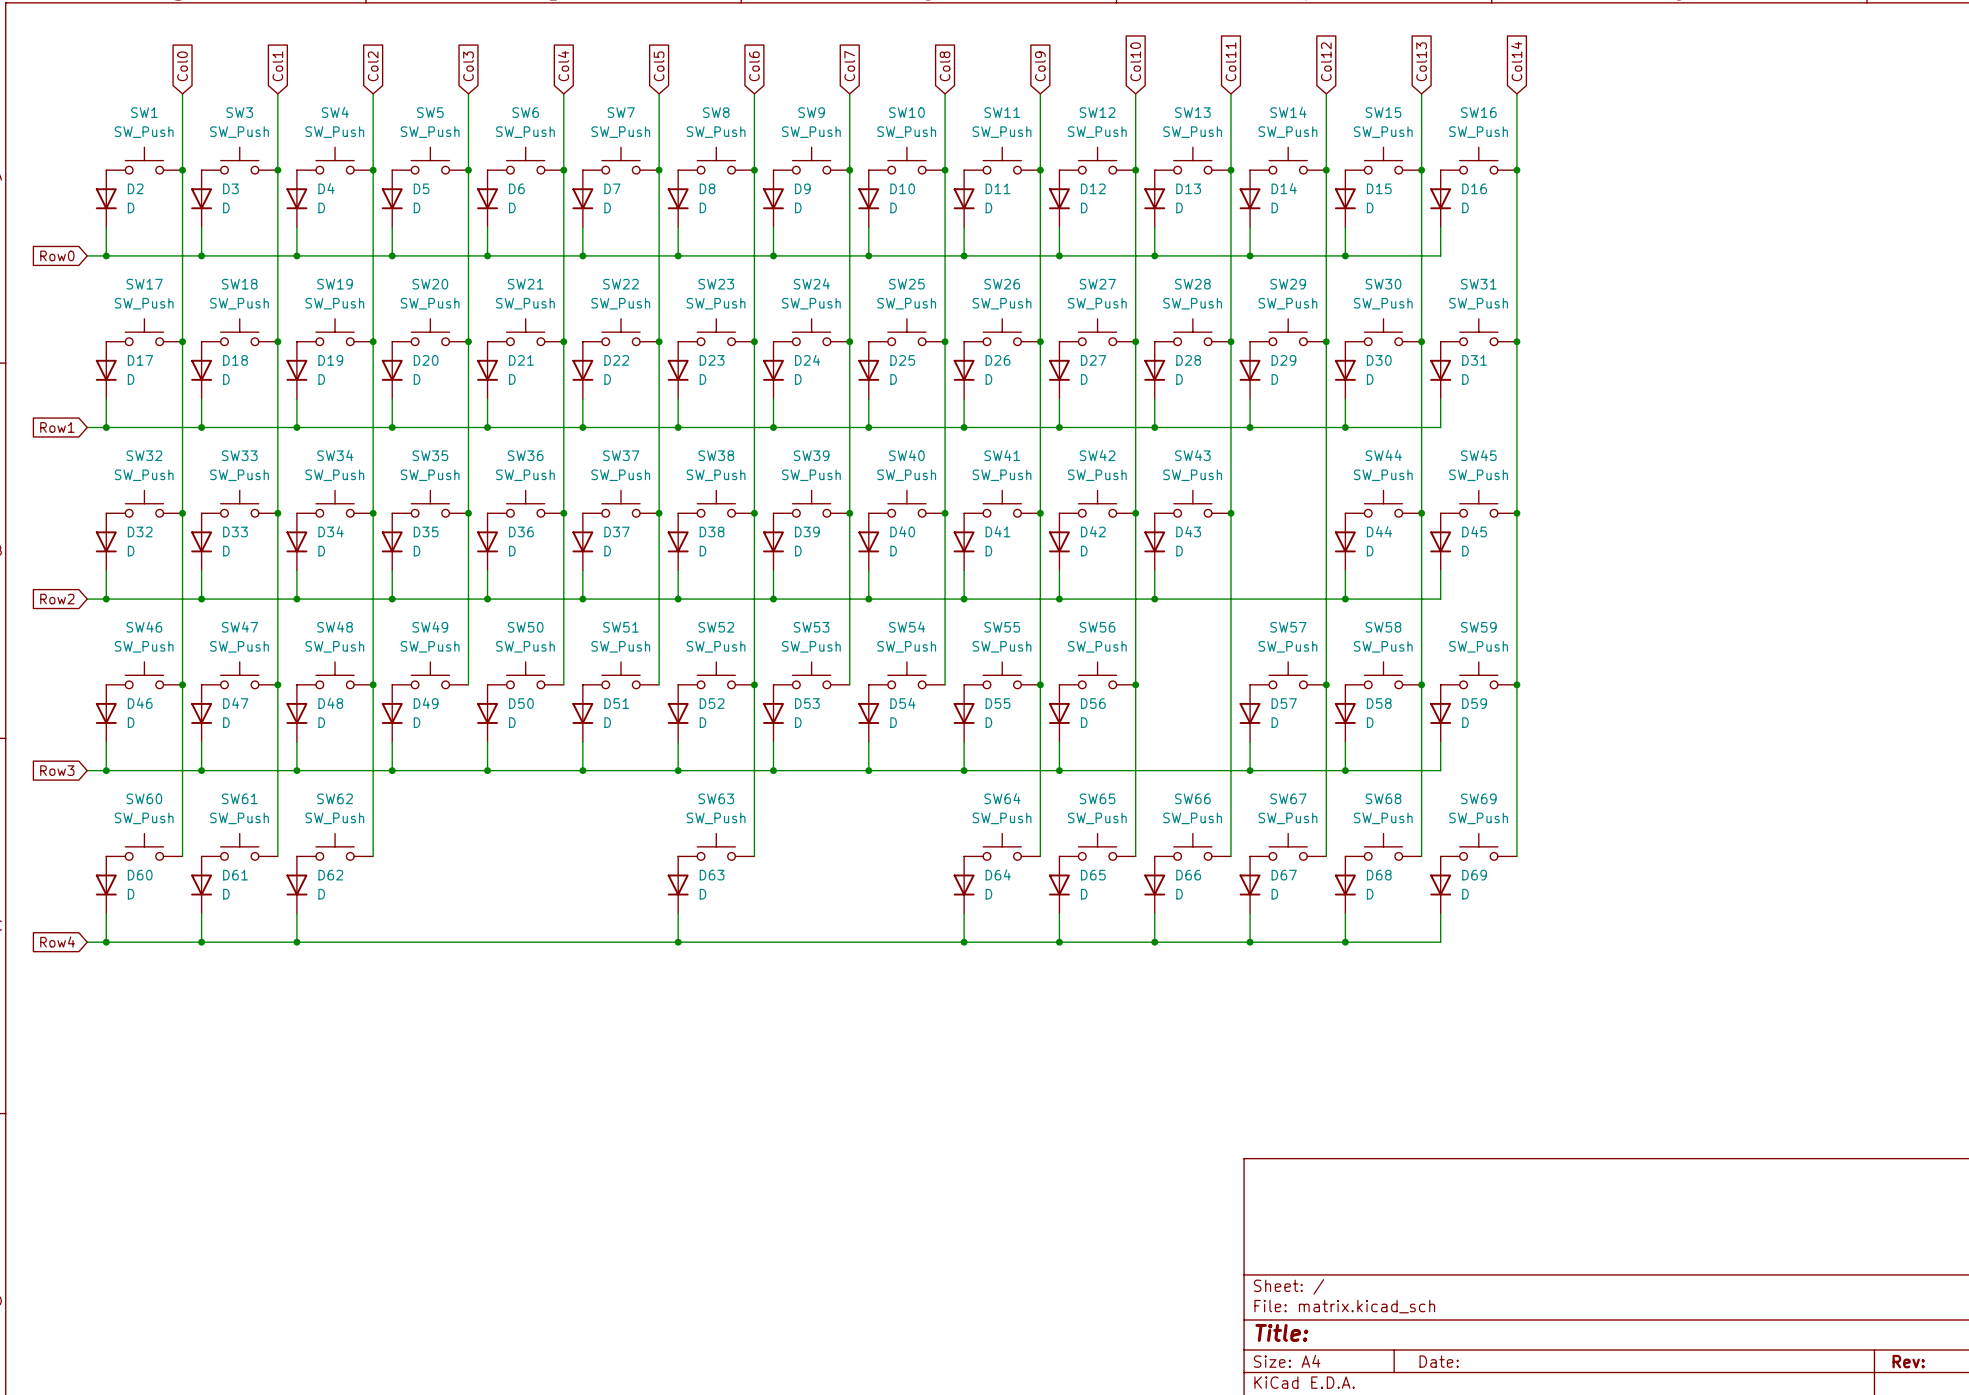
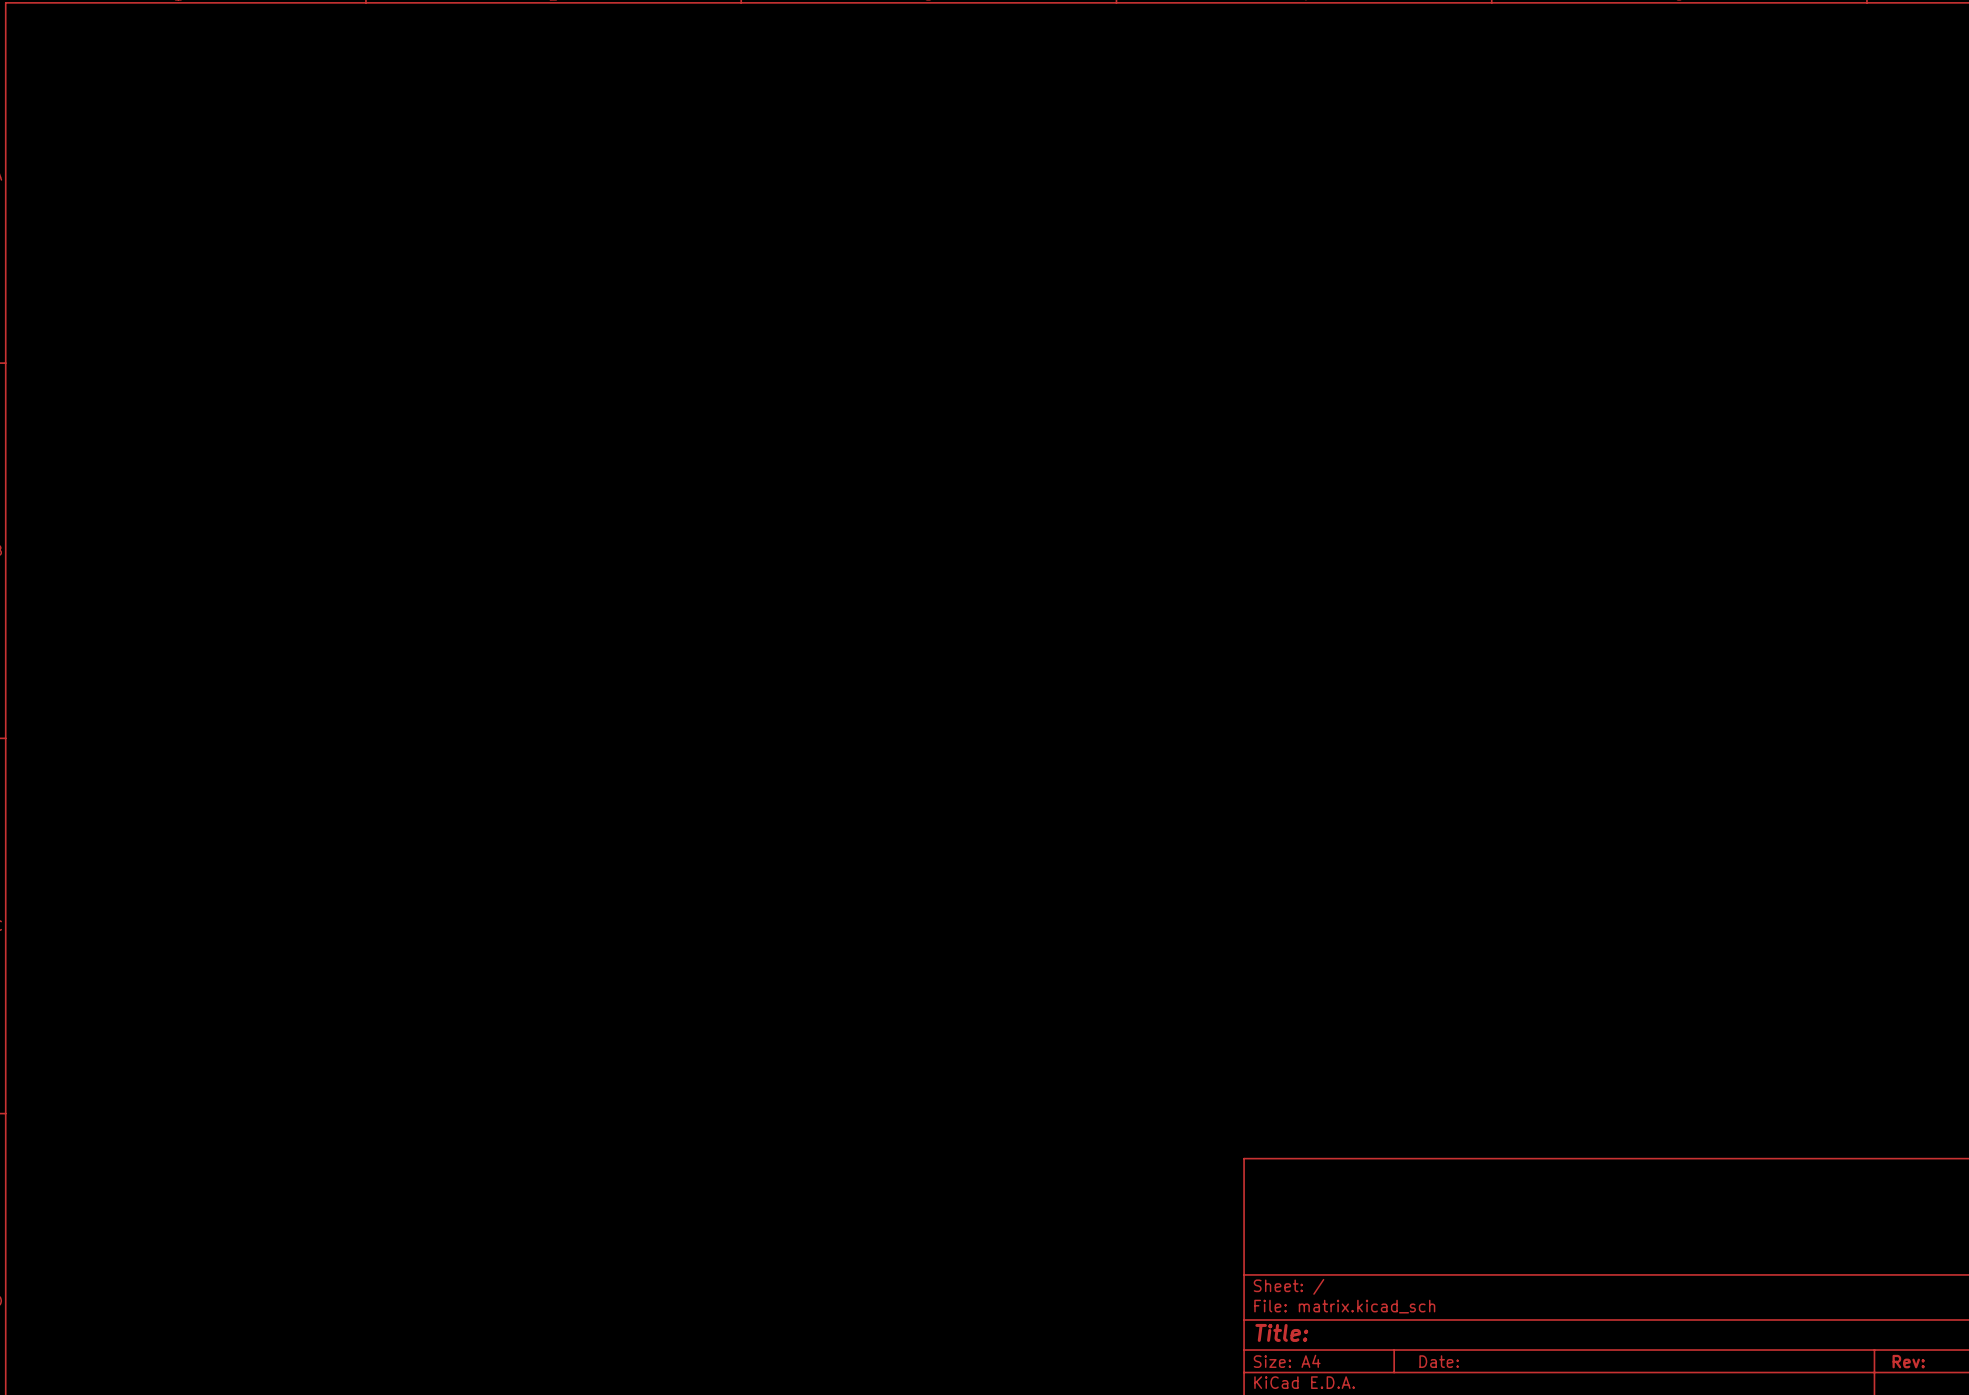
global label: Col10 (1135, 61) -> none
global label: Col11 (1230, 61) -> none
global label: Col12 (1326, 61) -> none
global label: Col13 (1421, 61) -> none
global label: Col14 (1516, 61) -> none
global label: Col0 (182, 66) -> none
global label: Col1 (277, 66) -> none
global label: Col2 (373, 66) -> none
global label: Col3 (468, 66) -> none
global label: Col4 (563, 66) -> none
global label: Col5 (659, 66) -> none
global label: Col6 (754, 66) -> none
global label: Col7 (849, 66) -> none
global label: Col8 (945, 66) -> none
global label: Col9 (1040, 66) -> none
wire: (182, 93) (182, 856) -> none
wire: (277, 93) (277, 856) -> none
wire: (373, 93) (373, 856) -> none
wire: (468, 93) (468, 684) -> none
wire: (563, 93) (563, 684) -> none
wire: (659, 93) (659, 684) -> none
wire: (754, 93) (754, 856) -> none
wire: (849, 93) (849, 684) -> none
wire: (945, 93) (945, 684) -> none
wire: (1040, 93) (1040, 856) -> none
wire: (1135, 93) (1135, 856) -> none
wire: (1230, 93) (1230, 856) -> none
wire: (1326, 93) (1326, 856) -> none
wire: (1421, 93) (1421, 856) -> none
wire: (1516, 93) (1516, 856) -> none
SW1: SW_Push (144, 160) -> none
SW3: SW_Push (239, 160) -> none
SW4: SW_Push (335, 160) -> none
SW5: SW_Push (430, 160) -> none
SW6: SW_Push (525, 160) -> none
SW7: SW_Push (620, 160) -> none
SW8: SW_Push (716, 160) -> none
SW9: SW_Push (811, 160) -> none
SW10: SW_Push (906, 160) -> none
SW11: SW_Push (1002, 160) -> none
SW12: SW_Push (1097, 160) -> none
SW13: SW_Push (1192, 160) -> none
SW14: SW_Push (1288, 160) -> none
SW15: SW_Push (1383, 160) -> none
SW16: SW_Push (1478, 160) -> none
junction: (182, 170) -> none
junction: (277, 170) -> none
junction: (373, 170) -> none
junction: (468, 170) -> none
junction: (563, 170) -> none
junction: (659, 170) -> none
junction: (754, 170) -> none
junction: (849, 170) -> none
junction: (945, 170) -> none
junction: (1040, 170) -> none
junction: (1135, 170) -> none
junction: (1230, 170) -> none
junction: (1326, 170) -> none
junction: (1421, 170) -> none
junction: (1516, 170) -> none
D2: D (106, 198) -> none
D3: D (201, 198) -> none
D4: D (296, 198) -> none
D5: D (392, 198) -> none
D6: D (487, 198) -> none
D7: D (582, 198) -> none
D8: D (678, 198) -> none
D9: D (773, 198) -> none
D10: D (868, 198) -> none
D11: D (964, 198) -> none
D12: D (1059, 198) -> none
D13: D (1154, 198) -> none
D14: D (1250, 198) -> none
D15: D (1345, 198) -> none
D16: D (1440, 198) -> none
wire: (106, 227) (106, 255) -> none
wire: (201, 227) (201, 255) -> none
wire: (296, 227) (296, 255) -> none
wire: (392, 227) (392, 255) -> none
wire: (487, 227) (487, 255) -> none
wire: (582, 227) (582, 255) -> none
wire: (678, 227) (678, 255) -> none
wire: (773, 227) (773, 255) -> none
wire: (868, 227) (868, 255) -> none
wire: (964, 227) (964, 255) -> none
wire: (1059, 227) (1059, 255) -> none
wire: (1154, 227) (1154, 255) -> none
wire: (1250, 227) (1250, 255) -> none
wire: (1345, 227) (1345, 255) -> none
wire: (1440, 227) (1440, 255) (87, 255) -> none
global label: Row0 (57, 255) -> none
junction: (106, 255) -> none
junction: (201, 255) -> none
junction: (296, 255) -> none
junction: (392, 255) -> none
junction: (487, 255) -> none
junction: (582, 255) -> none
junction: (678, 255) -> none
junction: (773, 255) -> none
junction: (868, 255) -> none
junction: (964, 255) -> none
junction: (1059, 255) -> none
junction: (1154, 255) -> none
junction: (1250, 255) -> none
junction: (1345, 255) -> none
SW17: SW_Push (144, 332) -> none
SW18: SW_Push (239, 332) -> none
SW19: SW_Push (335, 332) -> none
SW20: SW_Push (430, 332) -> none
SW21: SW_Push (525, 332) -> none
SW22: SW_Push (620, 332) -> none
SW23: SW_Push (716, 332) -> none
SW24: SW_Push (811, 332) -> none
SW25: SW_Push (906, 332) -> none
SW26: SW_Push (1002, 332) -> none
SW27: SW_Push (1097, 332) -> none
SW28: SW_Push (1192, 332) -> none
SW29: SW_Push (1288, 332) -> none
SW30: SW_Push (1383, 332) -> none
SW31: SW_Push (1478, 332) -> none
junction: (182, 341) -> none
junction: (277, 341) -> none
junction: (373, 341) -> none
junction: (468, 341) -> none
junction: (563, 341) -> none
junction: (659, 341) -> none
junction: (754, 341) -> none
junction: (849, 341) -> none
junction: (945, 341) -> none
junction: (1040, 341) -> none
junction: (1135, 341) -> none
junction: (1230, 341) -> none
junction: (1326, 341) -> none
junction: (1421, 341) -> none
junction: (1516, 341) -> none
D17: D (106, 370) -> none
D18: D (201, 370) -> none
D19: D (296, 370) -> none
D20: D (392, 370) -> none
D21: D (487, 370) -> none
D22: D (582, 370) -> none
D23: D (678, 370) -> none
D24: D (773, 370) -> none
D25: D (868, 370) -> none
D26: D (964, 370) -> none
D27: D (1059, 370) -> none
D28: D (1154, 370) -> none
D29: D (1250, 370) -> none
D30: D (1345, 370) -> none
D31: D (1440, 370) -> none
wire: (106, 398) (106, 427) -> none
wire: (201, 398) (201, 427) -> none
wire: (296, 398) (296, 427) -> none
wire: (392, 398) (392, 427) -> none
wire: (487, 398) (487, 427) -> none
wire: (582, 398) (582, 427) -> none
wire: (678, 398) (678, 427) -> none
wire: (773, 398) (773, 427) -> none
wire: (868, 398) (868, 427) -> none
wire: (964, 398) (964, 427) -> none
wire: (1059, 398) (1059, 427) -> none
wire: (1154, 398) (1154, 427) -> none
wire: (1250, 398) (1250, 427) -> none
wire: (1345, 398) (1345, 427) -> none
wire: (1440, 398) (1440, 427) (87, 427) -> none
global label: Row1 (57, 427) -> none
junction: (106, 427) -> none
junction: (201, 427) -> none
junction: (296, 427) -> none
junction: (392, 427) -> none
junction: (487, 427) -> none
junction: (582, 427) -> none
junction: (678, 427) -> none
junction: (773, 427) -> none
junction: (868, 427) -> none
junction: (964, 427) -> none
junction: (1059, 427) -> none
junction: (1154, 427) -> none
junction: (1250, 427) -> none
junction: (1345, 427) -> none
SW32: SW_Push (144, 503) -> none
SW33: SW_Push (239, 503) -> none
SW34: SW_Push (335, 503) -> none
SW35: SW_Push (430, 503) -> none
SW36: SW_Push (525, 503) -> none
SW37: SW_Push (620, 503) -> none
SW38: SW_Push (716, 503) -> none
SW39: SW_Push (811, 503) -> none
SW40: SW_Push (906, 503) -> none
SW41: SW_Push (1002, 503) -> none
SW42: SW_Push (1097, 503) -> none
SW43: SW_Push (1192, 503) -> none
SW44: SW_Push (1383, 503) -> none
SW45: SW_Push (1478, 503) -> none
junction: (182, 513) -> none
junction: (277, 513) -> none
junction: (373, 513) -> none
junction: (468, 513) -> none
junction: (563, 513) -> none
junction: (659, 513) -> none
junction: (754, 513) -> none
junction: (849, 513) -> none
junction: (945, 513) -> none
junction: (1040, 513) -> none
junction: (1135, 513) -> none
junction: (1230, 513) -> none
junction: (1421, 513) -> none
junction: (1516, 513) -> none
D32: D (106, 541) -> none
D33: D (201, 541) -> none
D34: D (296, 541) -> none
D35: D (392, 541) -> none
D36: D (487, 541) -> none
D37: D (582, 541) -> none
D38: D (678, 541) -> none
D39: D (773, 541) -> none
D40: D (868, 541) -> none
D41: D (964, 541) -> none
D42: D (1059, 541) -> none
D43: D (1154, 541) -> none
D44: D (1345, 541) -> none
D45: D (1440, 541) -> none
wire: (106, 570) (106, 599) -> none
wire: (201, 570) (201, 599) -> none
wire: (296, 570) (296, 599) -> none
wire: (392, 570) (392, 599) -> none
wire: (487, 570) (487, 599) -> none
wire: (582, 570) (582, 599) -> none
wire: (678, 570) (678, 599) -> none
wire: (773, 570) (773, 599) -> none
wire: (868, 570) (868, 599) -> none
wire: (964, 570) (964, 599) -> none
wire: (1059, 570) (1059, 599) -> none
wire: (1154, 570) (1154, 599) -> none
wire: (1345, 570) (1345, 599) -> none
wire: (1440, 570) (1440, 599) (87, 599) -> none
global label: Row2 (57, 599) -> none
junction: (106, 599) -> none
junction: (201, 599) -> none
junction: (296, 599) -> none
junction: (392, 599) -> none
junction: (487, 599) -> none
junction: (582, 599) -> none
junction: (678, 599) -> none
junction: (773, 599) -> none
junction: (868, 599) -> none
junction: (964, 599) -> none
junction: (1059, 599) -> none
junction: (1154, 599) -> none
junction: (1345, 599) -> none
SW46: SW_Push (144, 675) -> none
SW47: SW_Push (239, 675) -> none
SW48: SW_Push (335, 675) -> none
SW49: SW_Push (430, 675) -> none
SW50: SW_Push (525, 675) -> none
SW51: SW_Push (620, 675) -> none
SW52: SW_Push (716, 675) -> none
SW53: SW_Push (811, 675) -> none
SW54: SW_Push (906, 675) -> none
SW55: SW_Push (1002, 675) -> none
SW56: SW_Push (1097, 675) -> none
SW57: SW_Push (1288, 675) -> none
SW58: SW_Push (1383, 675) -> none
SW59: SW_Push (1478, 675) -> none
junction: (182, 684) -> none
junction: (277, 684) -> none
junction: (373, 684) -> none
junction: (754, 684) -> none
junction: (1040, 684) -> none
junction: (1135, 684) -> none
junction: (1326, 684) -> none
junction: (1421, 684) -> none
junction: (1516, 684) -> none
D46: D (106, 713) -> none
D47: D (201, 713) -> none
D48: D (296, 713) -> none
D49: D (392, 713) -> none
D50: D (487, 713) -> none
D51: D (582, 713) -> none
D52: D (678, 713) -> none
D53: D (773, 713) -> none
D54: D (868, 713) -> none
D55: D (964, 713) -> none
D56: D (1059, 713) -> none
D57: D (1250, 713) -> none
D58: D (1345, 713) -> none
D59: D (1440, 713) -> none
wire: (106, 742) (106, 770) -> none
wire: (201, 742) (201, 770) -> none
wire: (296, 742) (296, 770) -> none
wire: (392, 742) (392, 770) -> none
wire: (487, 742) (487, 770) -> none
wire: (582, 742) (582, 770) -> none
wire: (678, 742) (678, 770) -> none
wire: (773, 742) (773, 770) -> none
wire: (868, 742) (868, 770) -> none
wire: (964, 742) (964, 770) -> none
wire: (1059, 742) (1059, 770) -> none
wire: (1250, 742) (1250, 770) -> none
wire: (1345, 742) (1345, 770) -> none
wire: (1440, 742) (1440, 770) (87, 770) -> none
global label: Row3 (57, 770) -> none
junction: (106, 770) -> none
junction: (201, 770) -> none
junction: (296, 770) -> none
junction: (392, 770) -> none
junction: (487, 770) -> none
junction: (582, 770) -> none
junction: (678, 770) -> none
junction: (773, 770) -> none
junction: (868, 770) -> none
junction: (964, 770) -> none
junction: (1059, 770) -> none
junction: (1250, 770) -> none
junction: (1345, 770) -> none
SW60: SW_Push (144, 846) -> none
SW61: SW_Push (239, 846) -> none
SW62: SW_Push (335, 846) -> none
SW63: SW_Push (716, 846) -> none
SW64: SW_Push (1002, 846) -> none
SW65: SW_Push (1097, 846) -> none
SW66: SW_Push (1192, 846) -> none
SW67: SW_Push (1288, 846) -> none
SW68: SW_Push (1383, 846) -> none
SW69: SW_Push (1478, 846) -> none
D60: D (106, 885) -> none
D61: D (201, 885) -> none
D62: D (296, 885) -> none
D63: D (678, 885) -> none
D64: D (964, 885) -> none
D65: D (1059, 885) -> none
D66: D (1154, 885) -> none
D67: D (1250, 885) -> none
D68: D (1345, 885) -> none
D69: D (1440, 885) -> none
wire: (106, 913) (106, 942) -> none
wire: (201, 913) (201, 942) -> none
wire: (296, 913) (296, 942) -> none
wire: (678, 913) (678, 942) -> none
wire: (964, 913) (964, 942) -> none
wire: (1059, 913) (1059, 942) -> none
wire: (1154, 913) (1154, 942) -> none
wire: (1250, 913) (1250, 942) -> none
wire: (1345, 913) (1345, 942) -> none
wire: (1440, 913) (1440, 942) (87, 942) -> none
global label: Row4 (57, 941) -> none
junction: (106, 942) -> none
junction: (201, 942) -> none
junction: (296, 942) -> none
junction: (678, 942) -> none
junction: (964, 942) -> none
junction: (1059, 942) -> none
junction: (1154, 942) -> none
junction: (1250, 942) -> none
junction: (1345, 942) -> none

